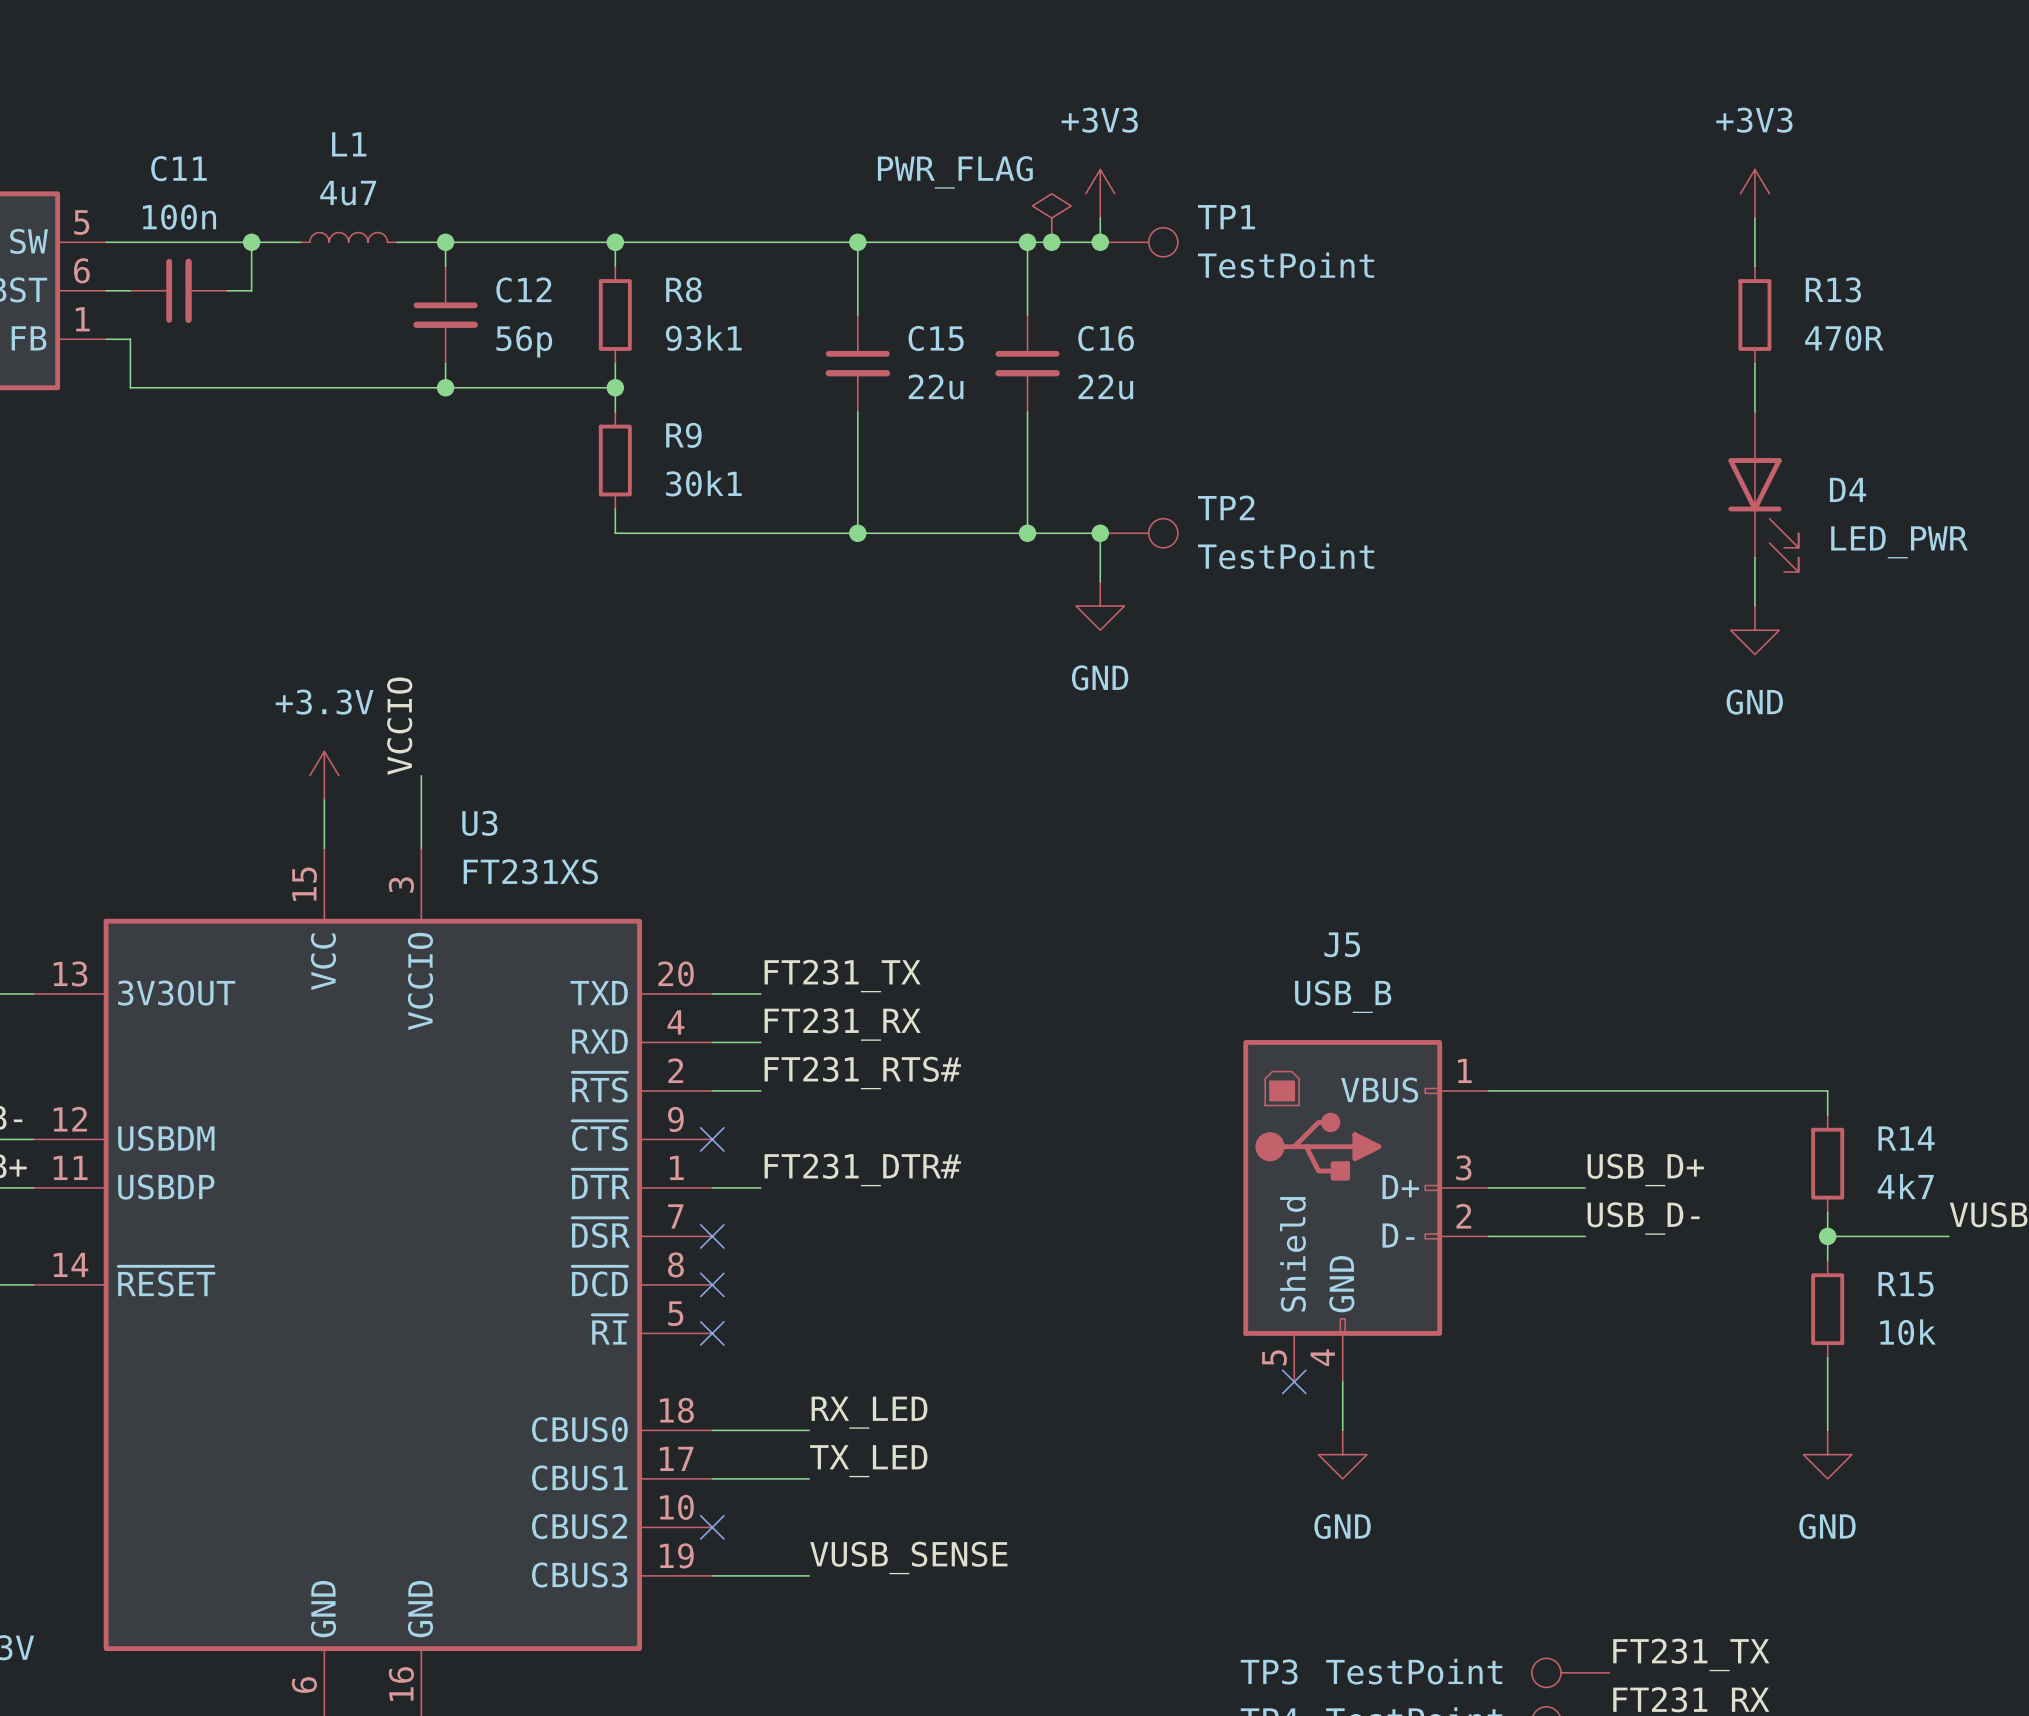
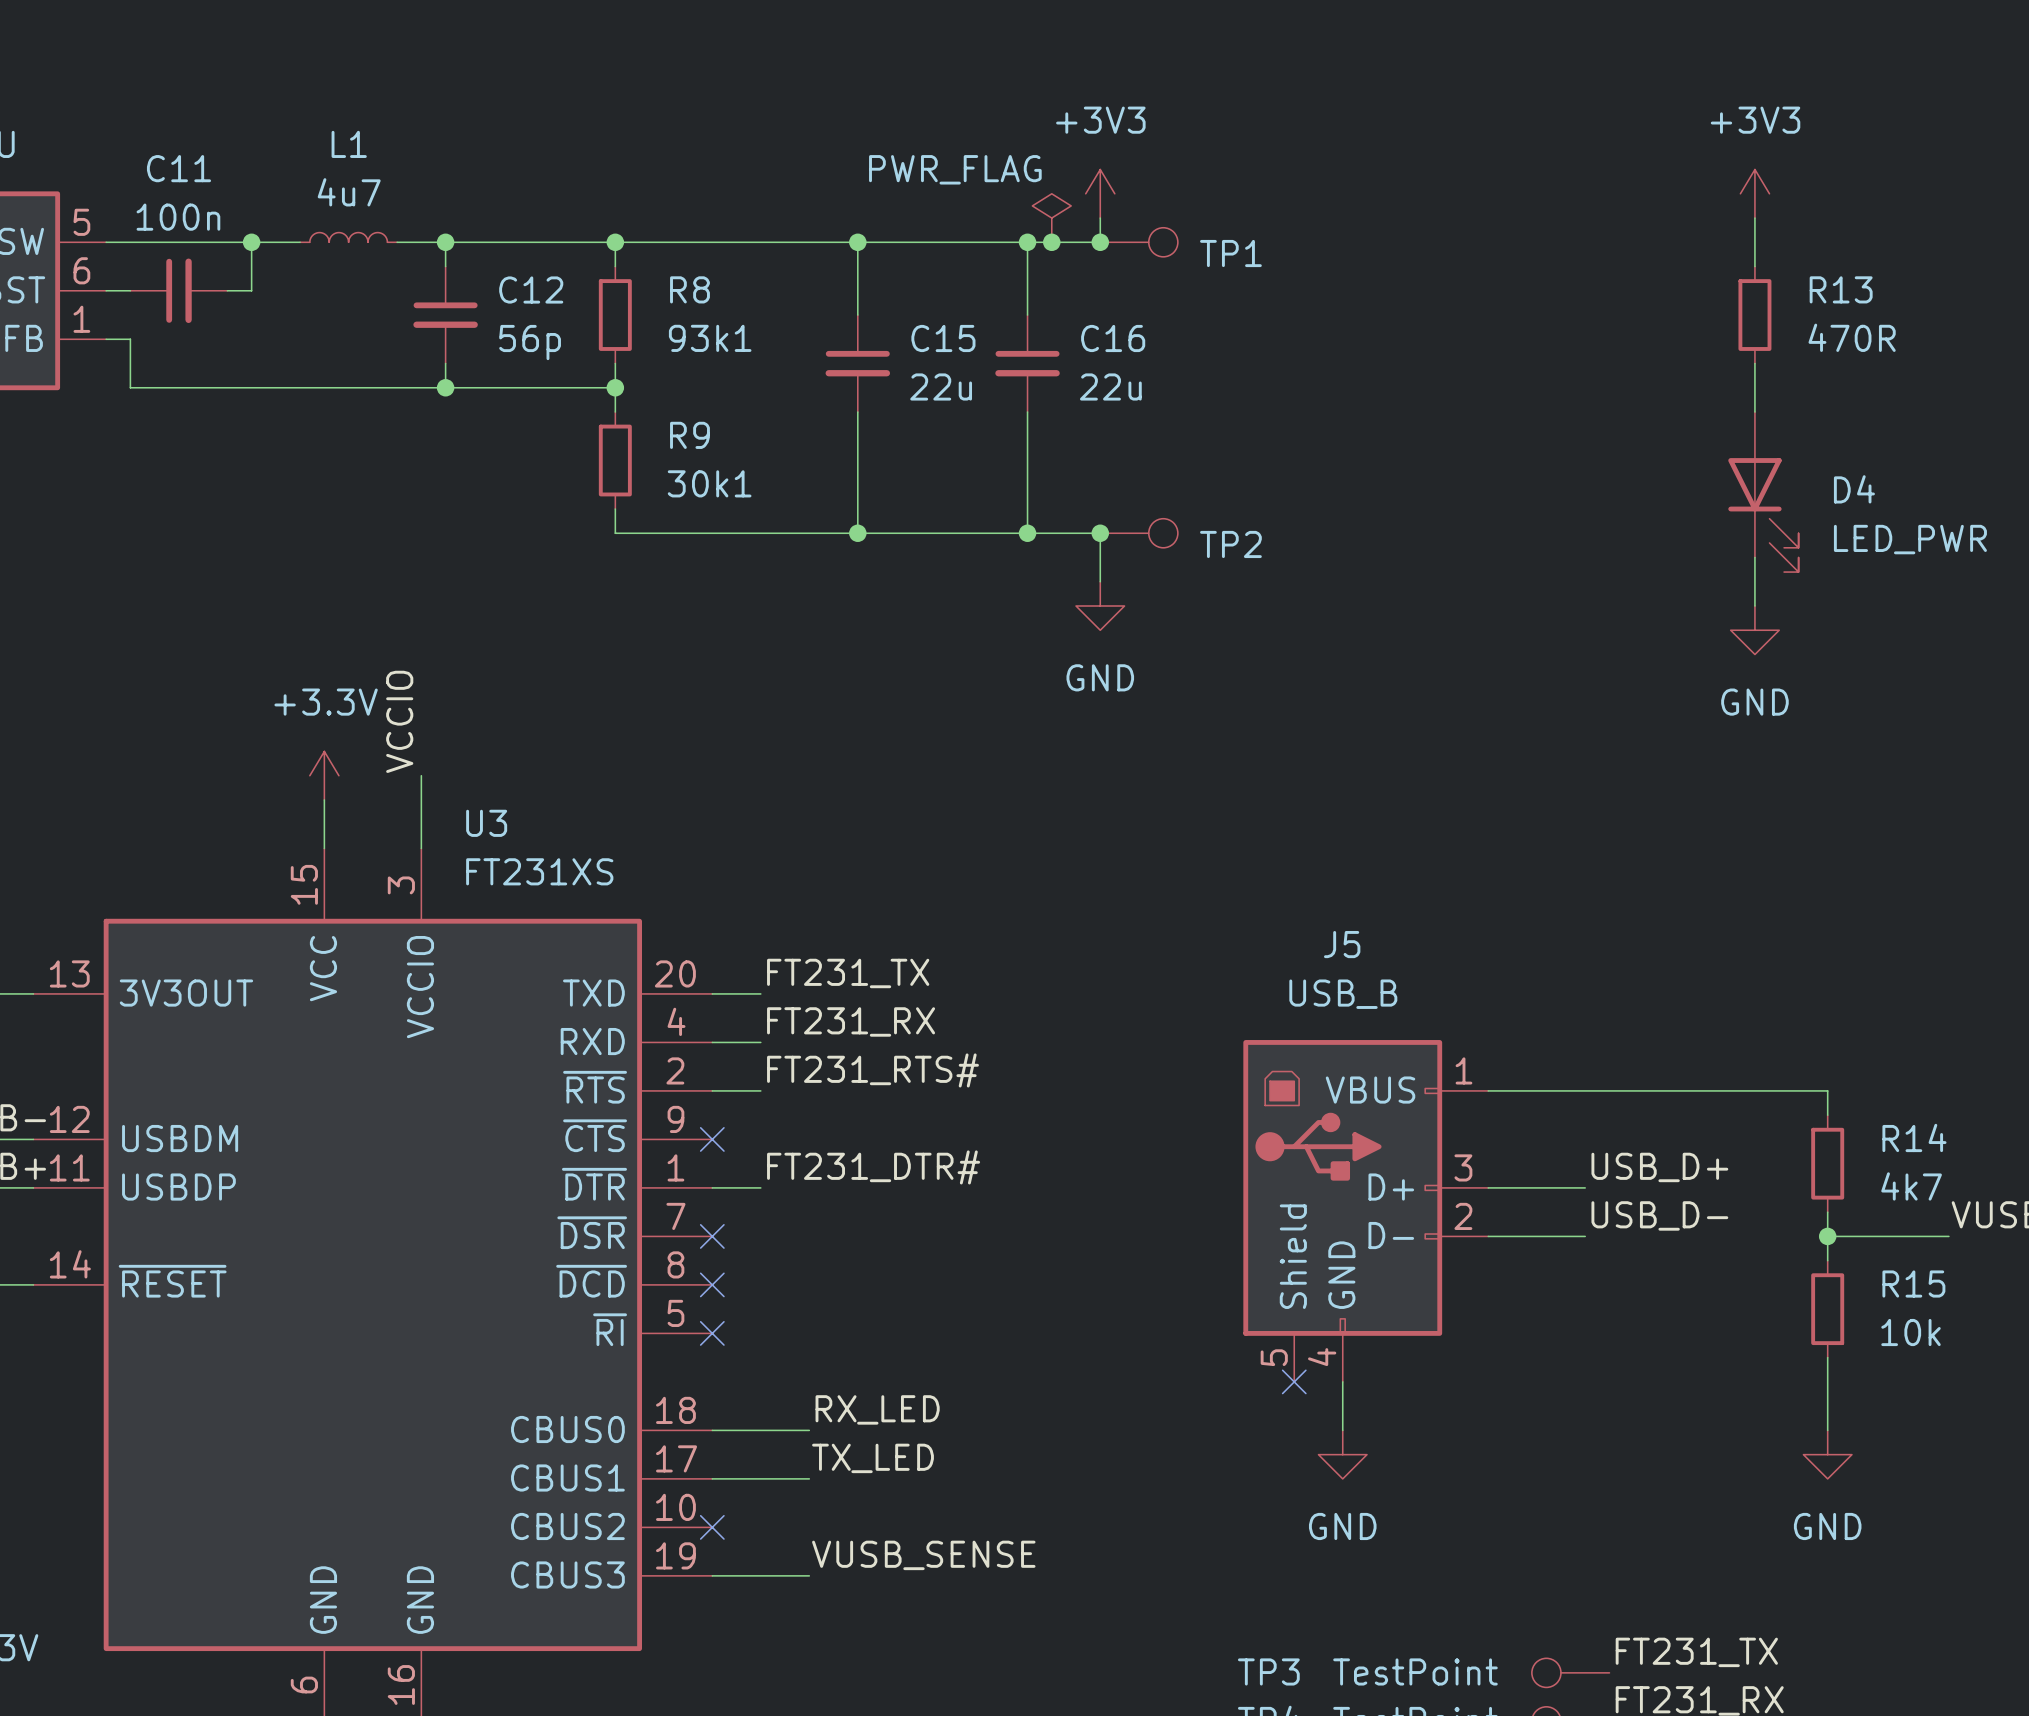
TP1 name position: TP1 (1226, 217) -> TP1 (1230, 253)
TP1 value: TestPoint (1286, 265) -> none
TP2 name position: TP2 (1226, 507) -> TP2 (1230, 544)
TP2 value: TestPoint (1286, 556) -> none

